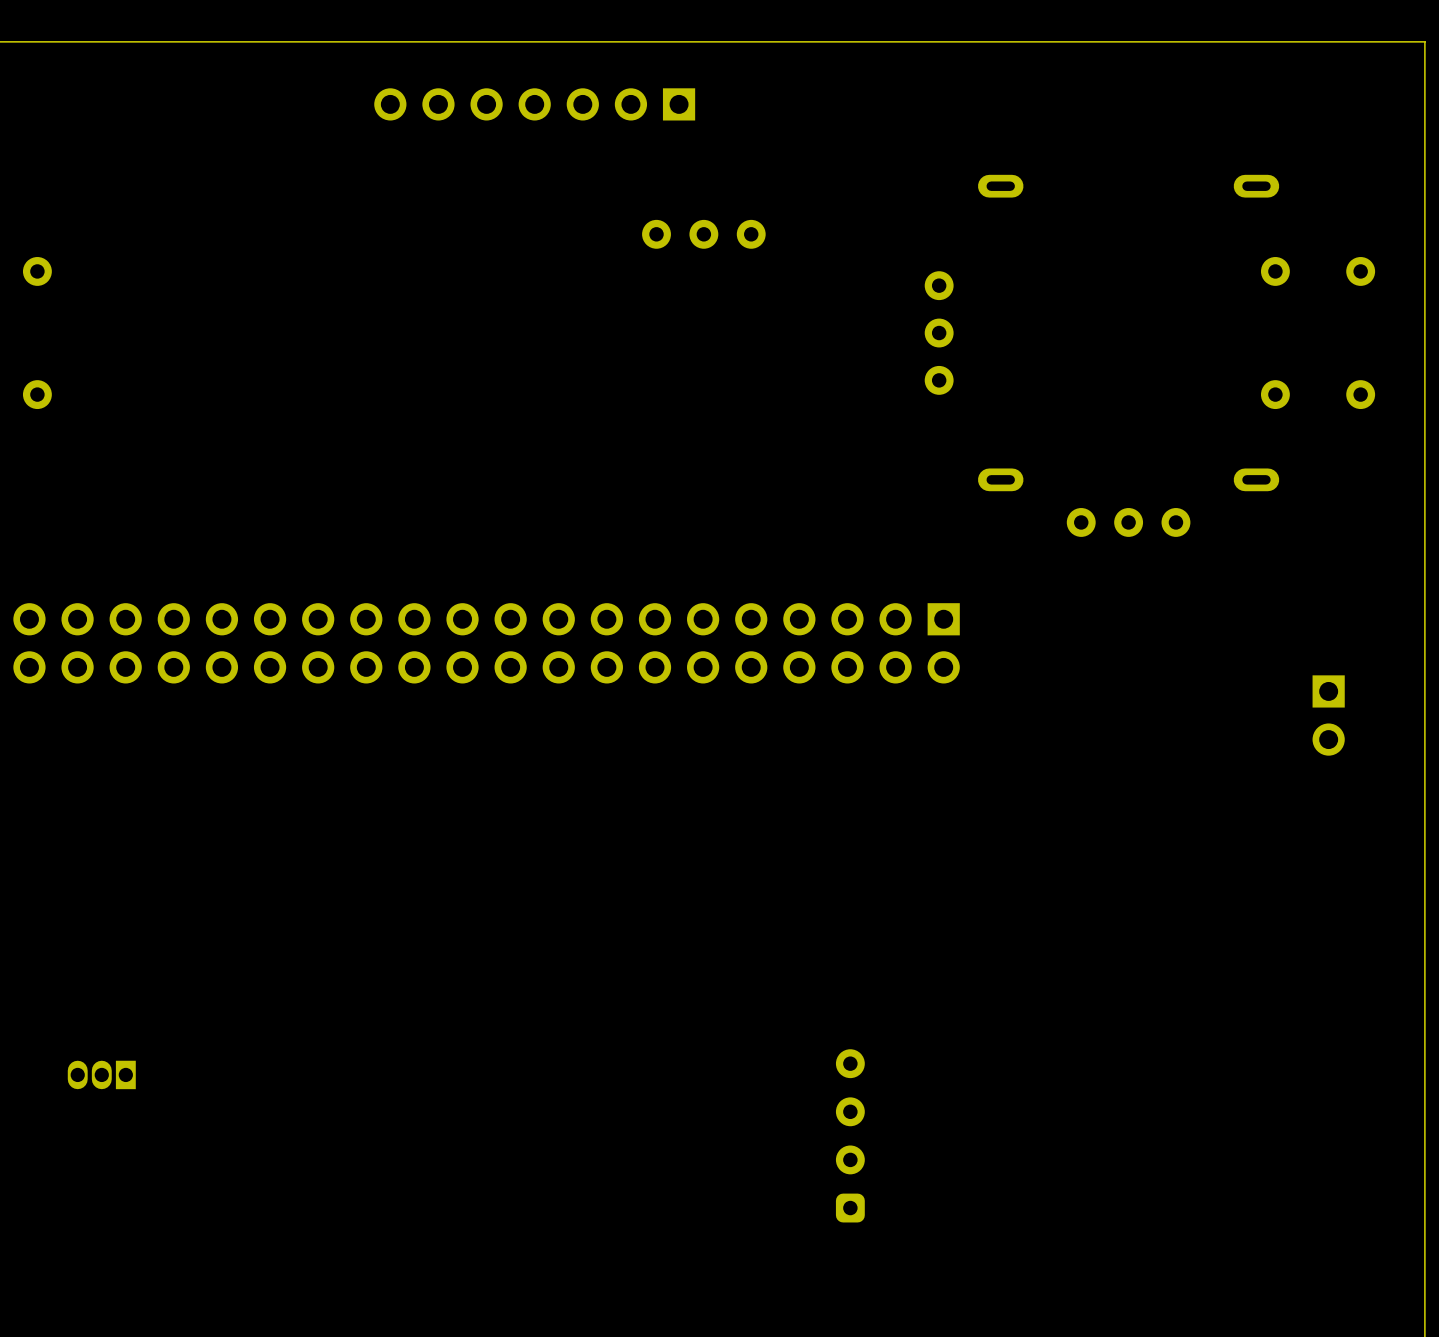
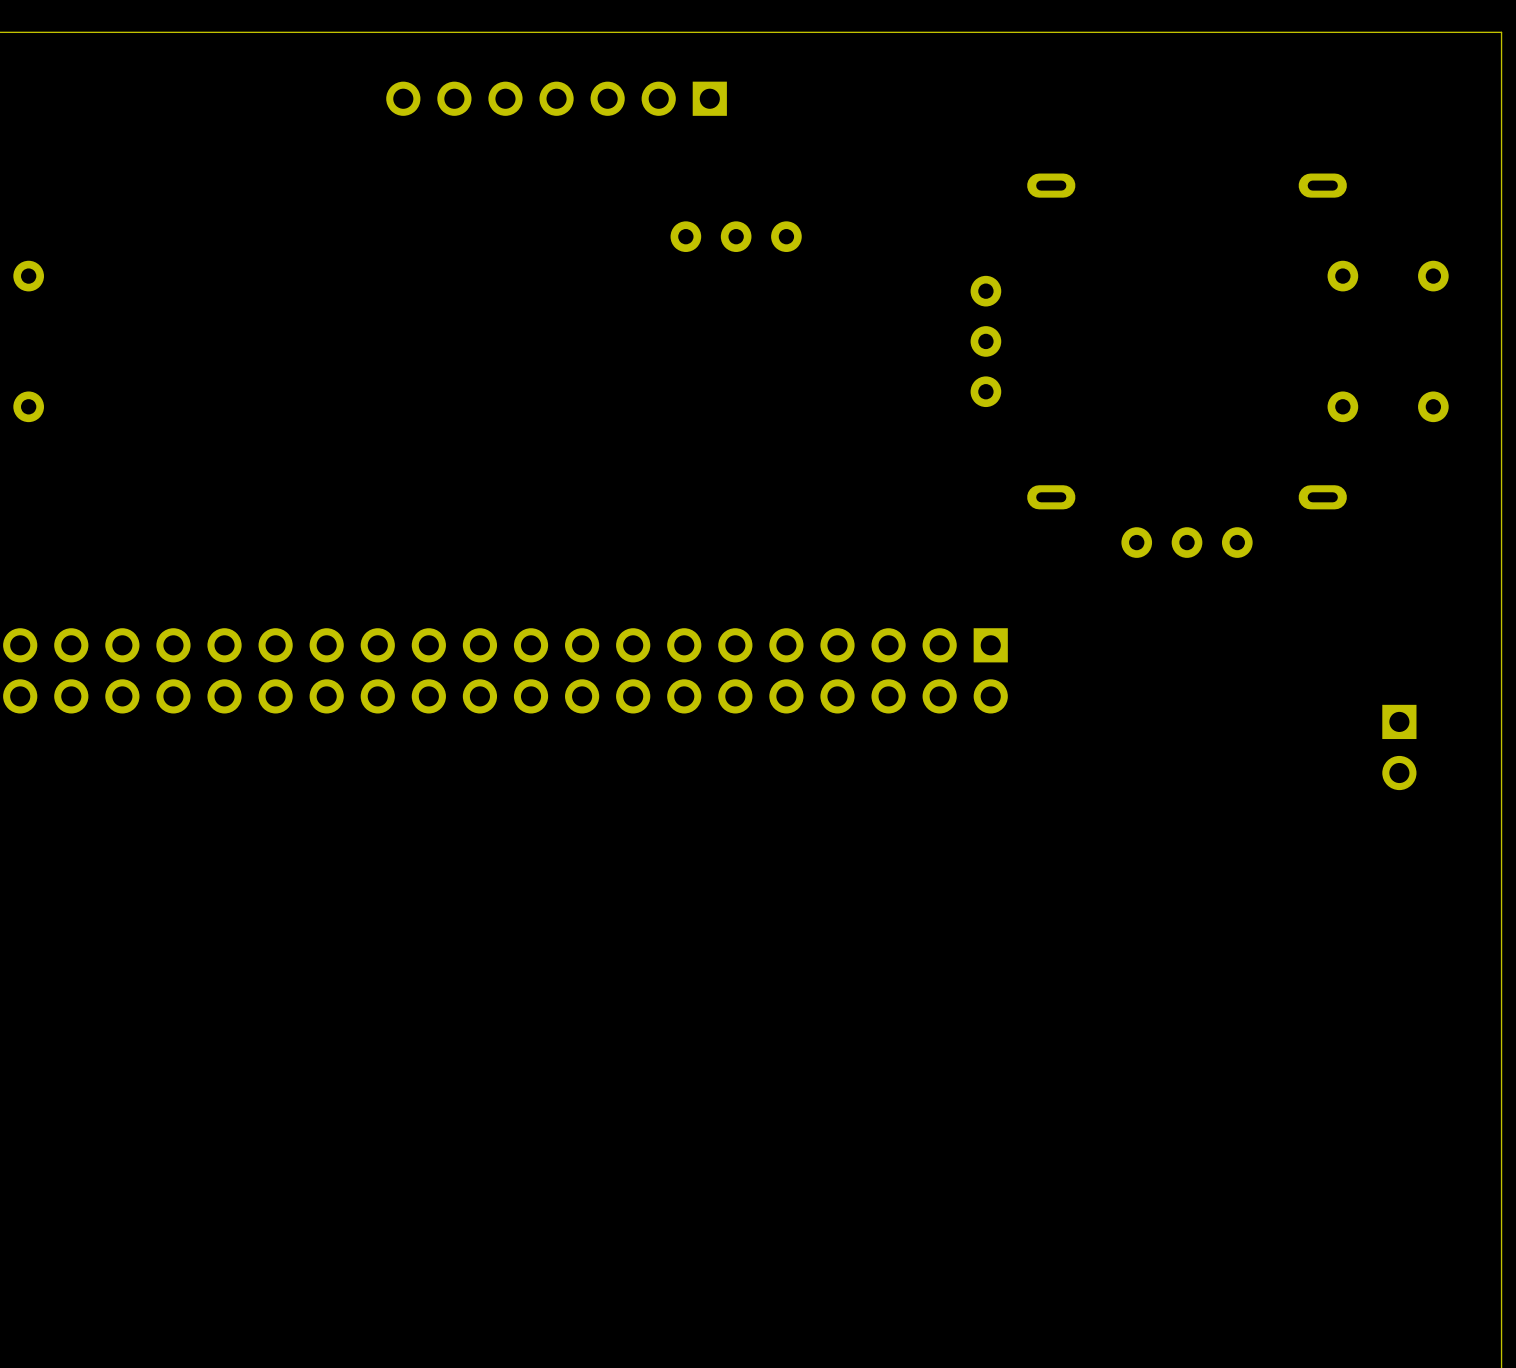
part: (101, 1074) -> none
part: (850, 1135) -> none

